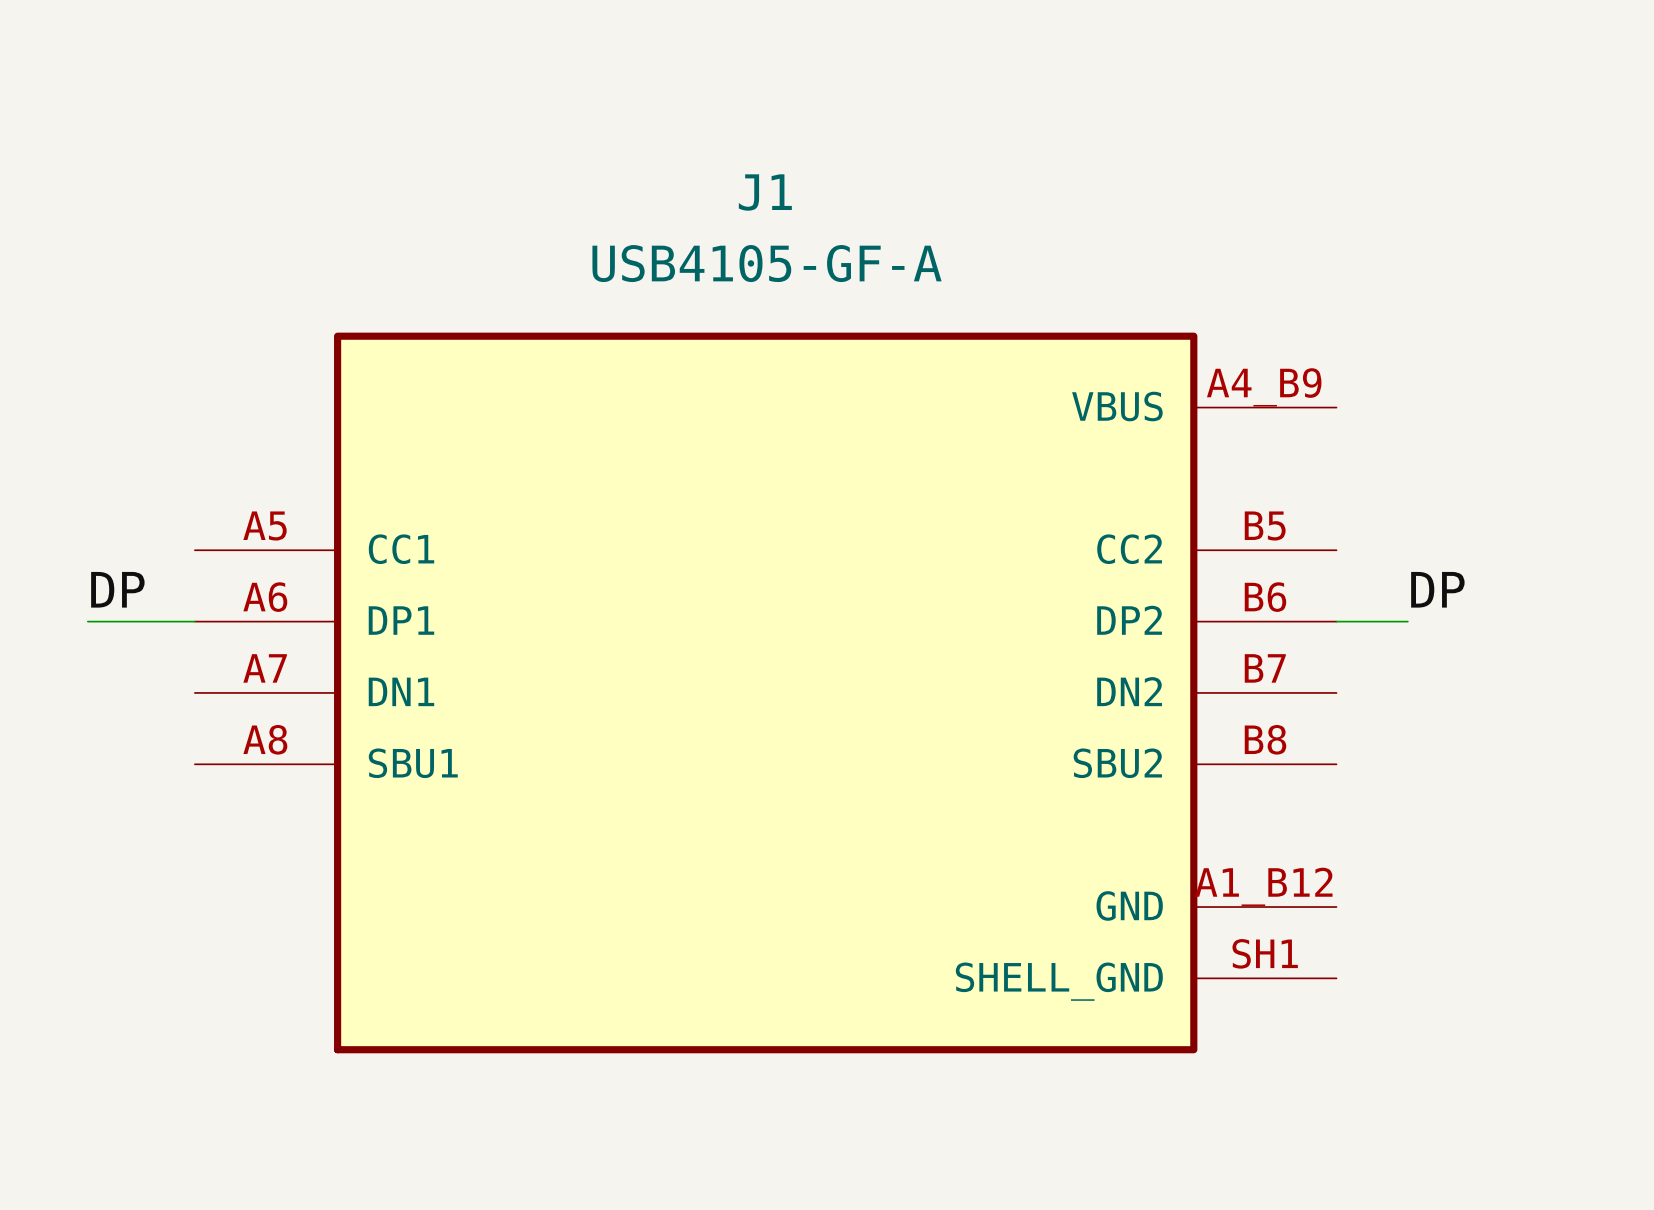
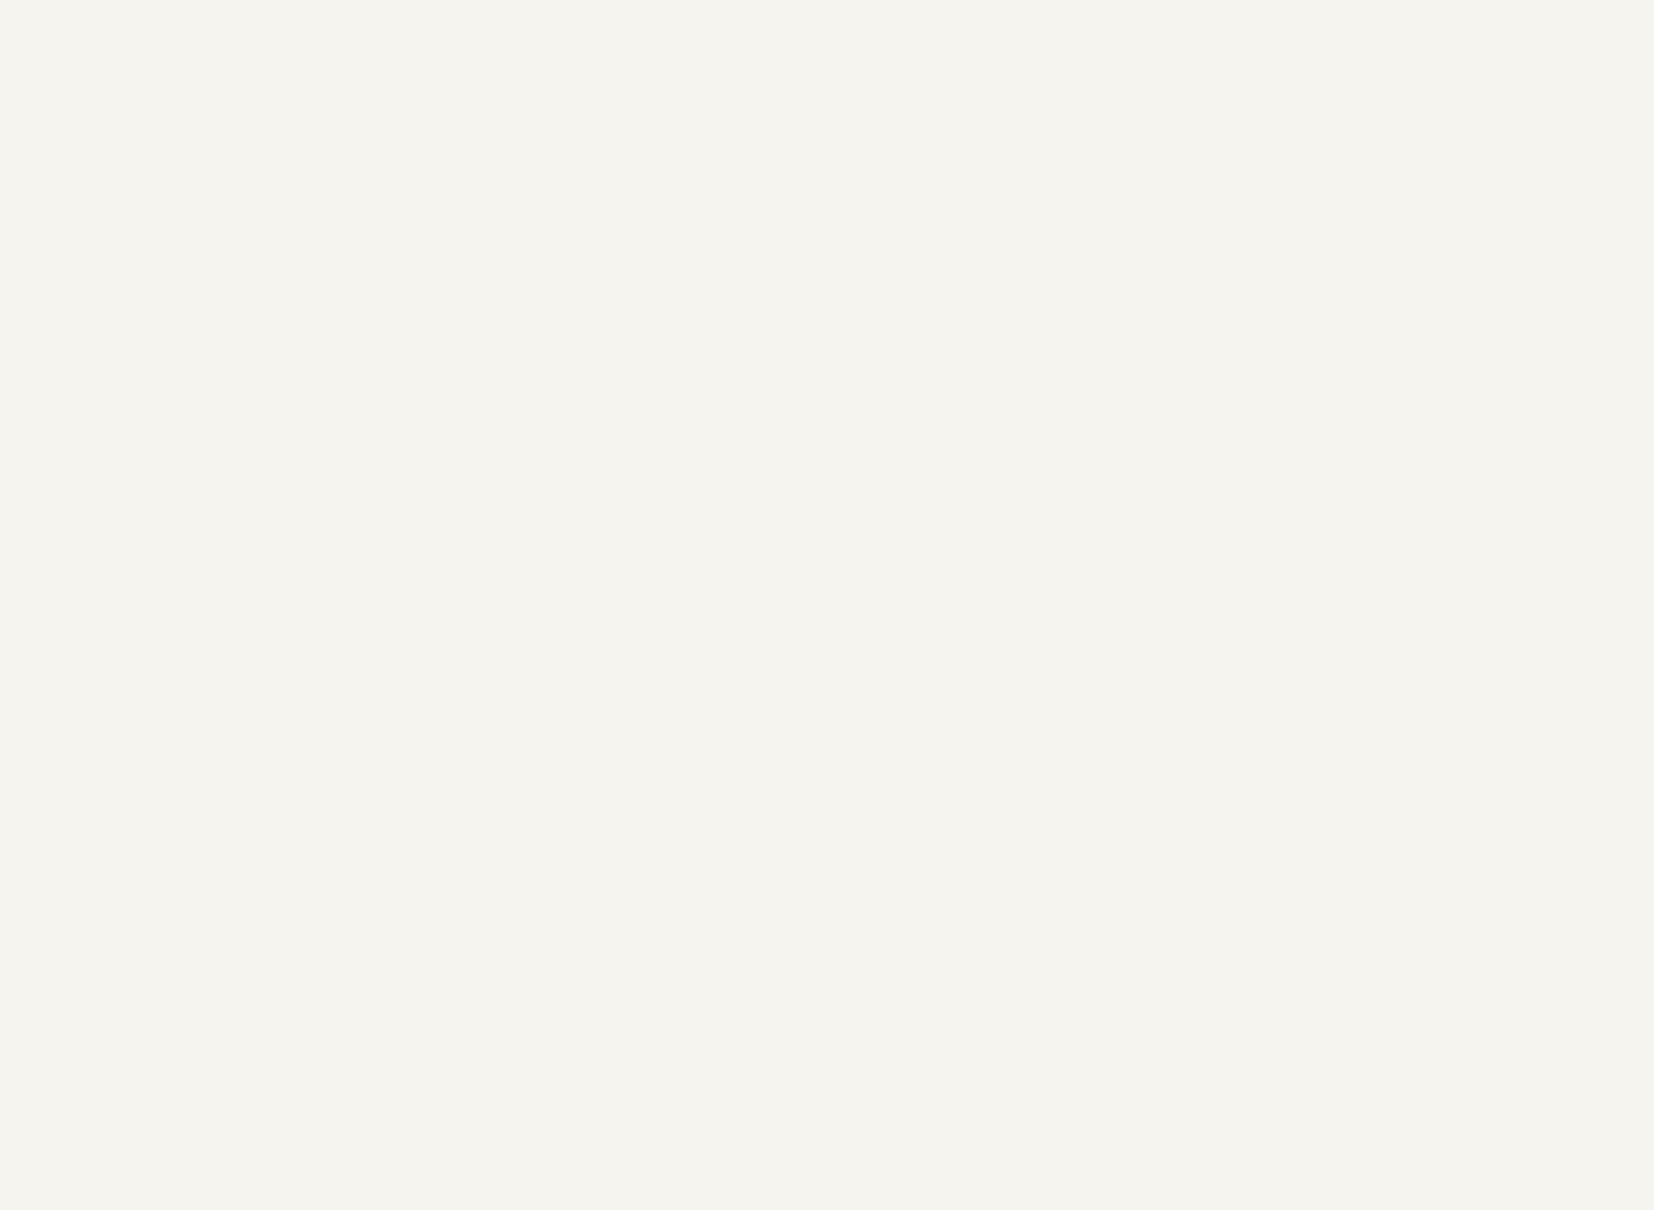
label: DP (117, 589) -> none
label: DP (1437, 589) -> none
wire: (87, 621) (194, 621) -> none
wire: (1336, 621) (1407, 621) -> none
J1: USB4105-GF-A (765, 692) -> none

